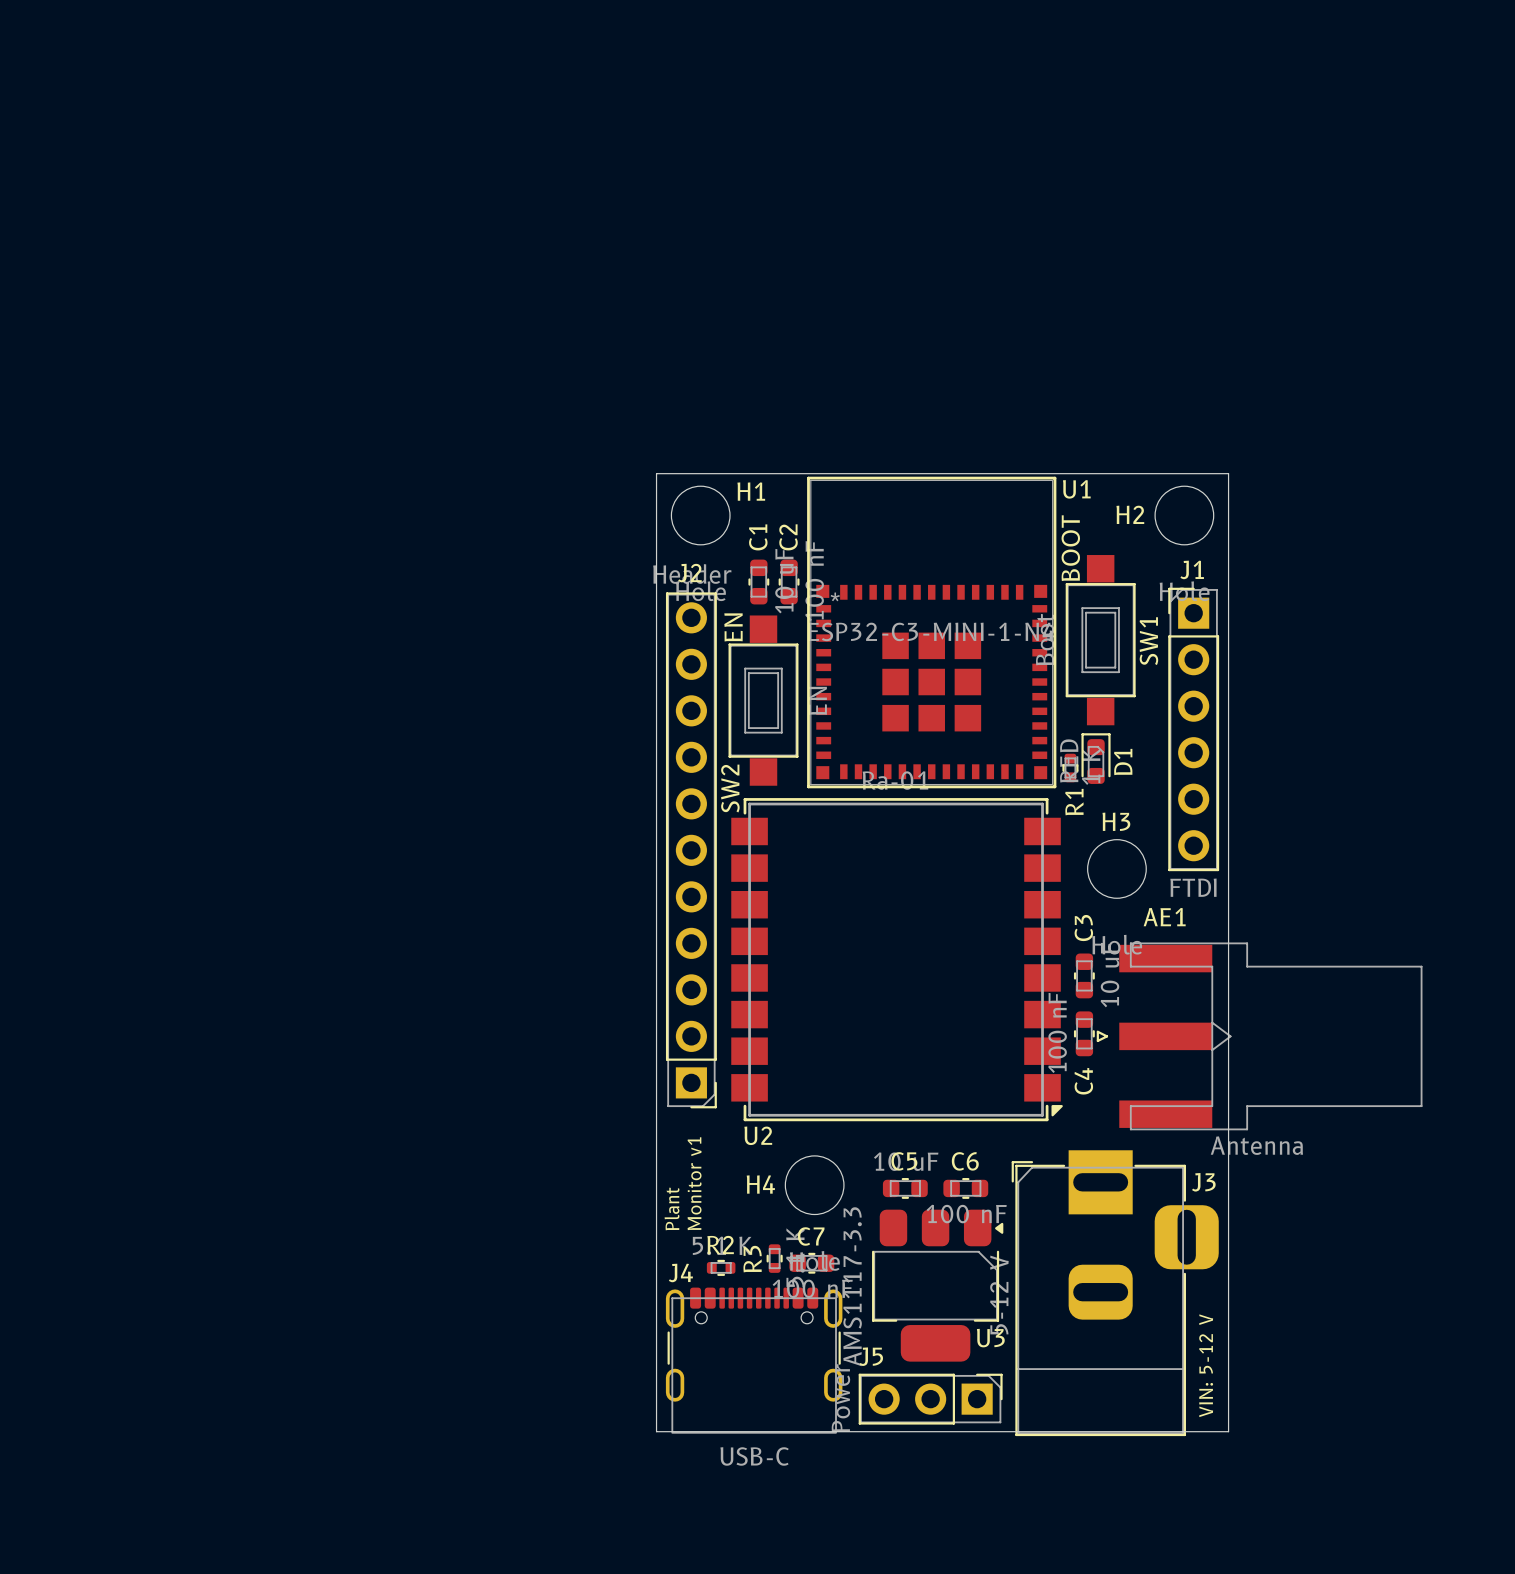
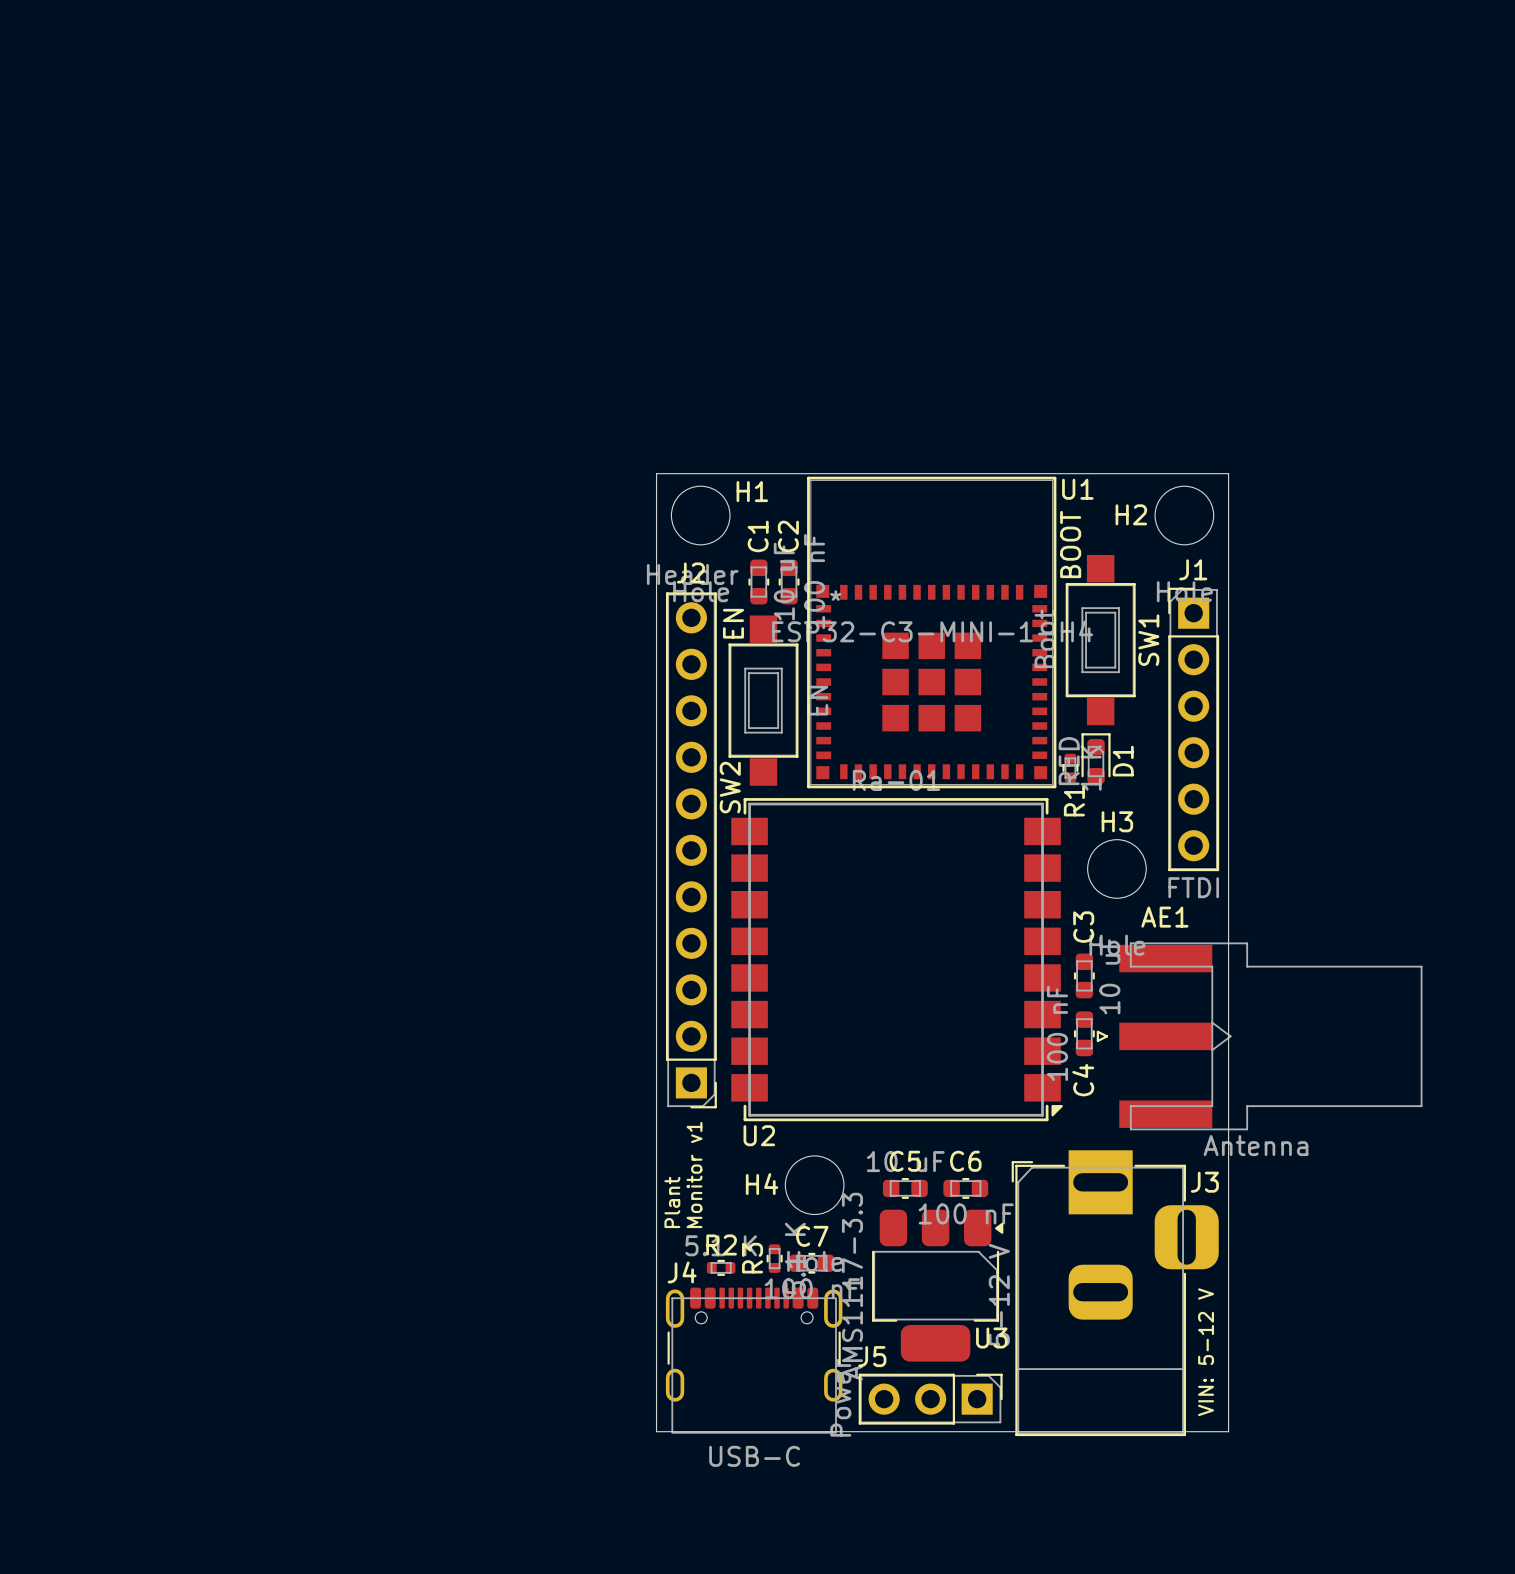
U1 value: ESP32-C3-MINI-1-N4 (931, 631) -> ESP32-C3-MINI-1-H4 (932, 631)

